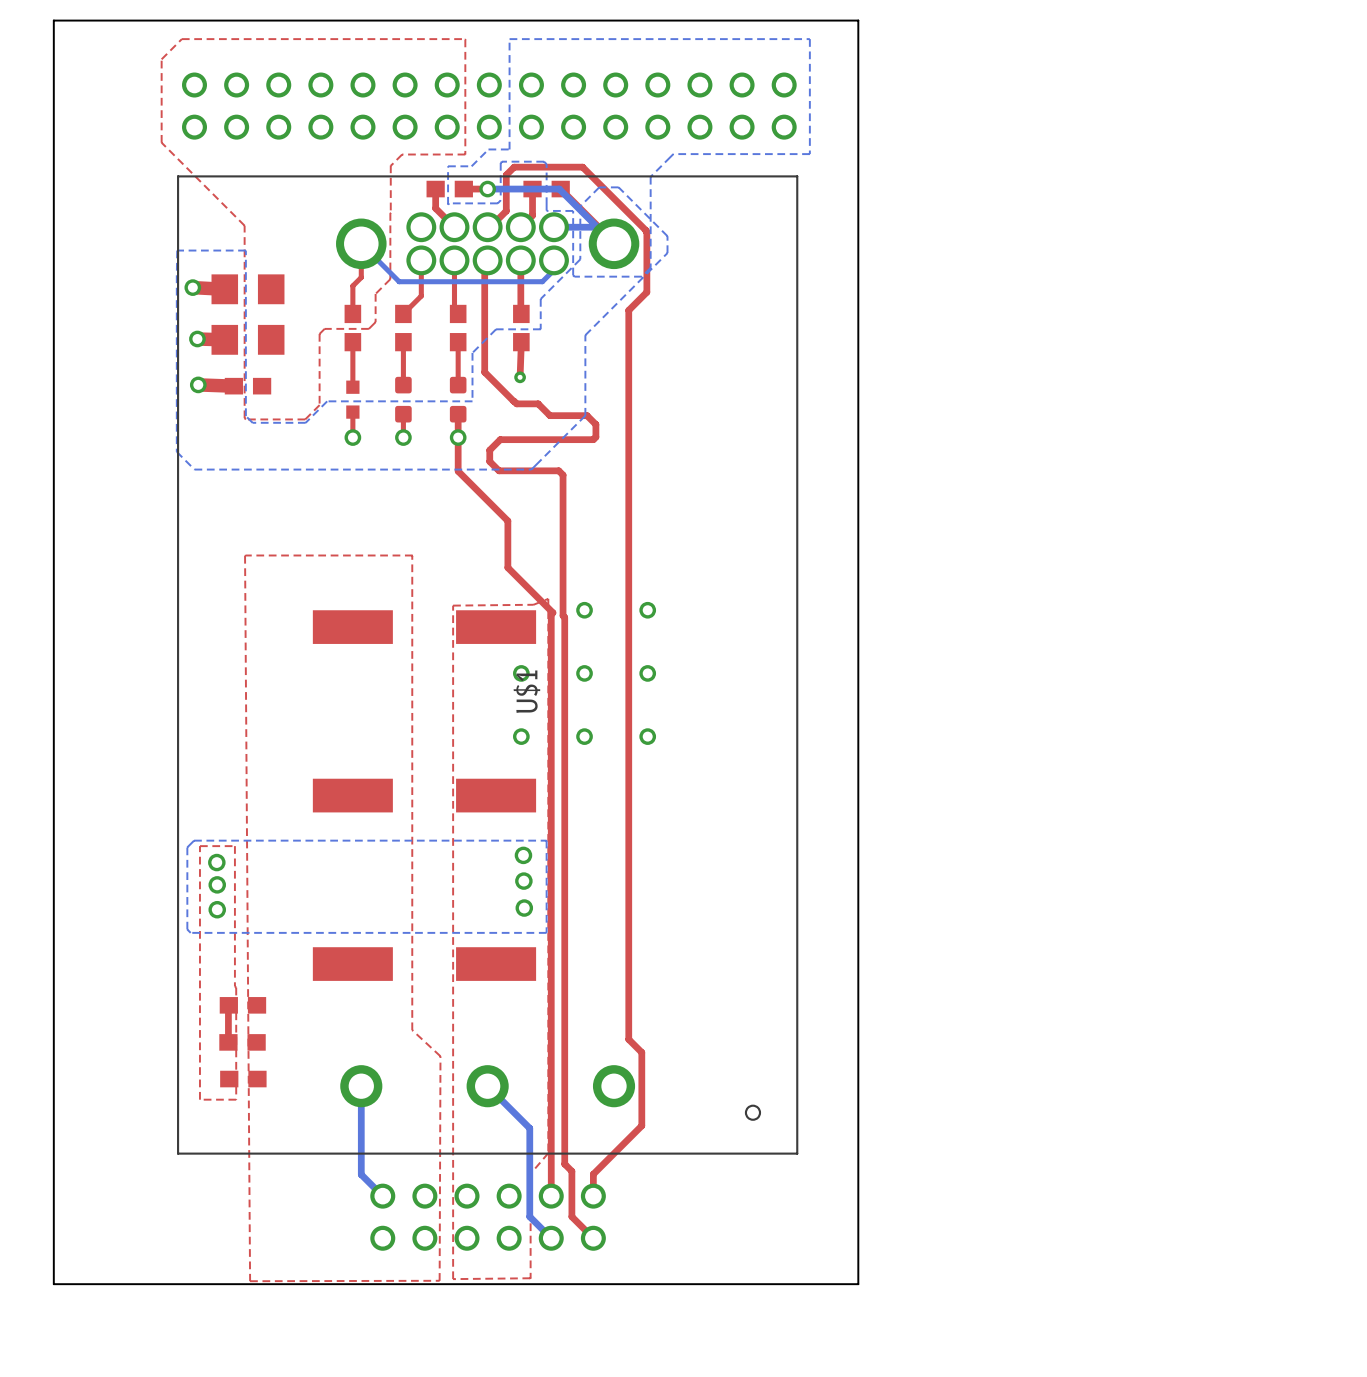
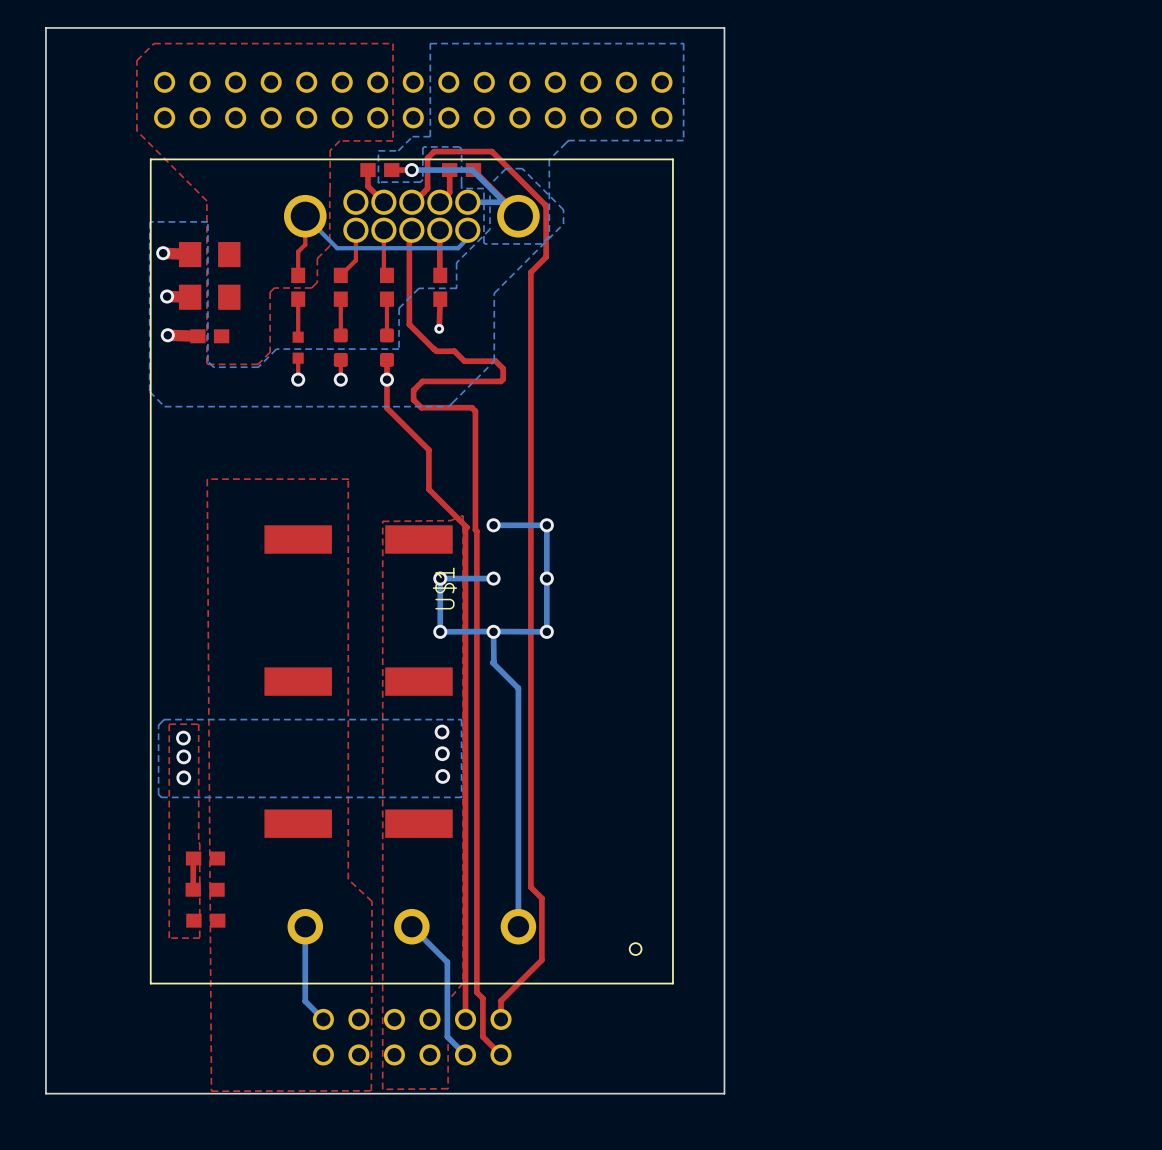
bottom track: none -> (493, 525) (546, 525) (546, 631) (493, 631)
bottom track: none -> (493, 578) (440, 578) (440, 631) (493, 631)
bottom track: none -> (493, 631) (492, 662) (518, 688) (518, 926)

